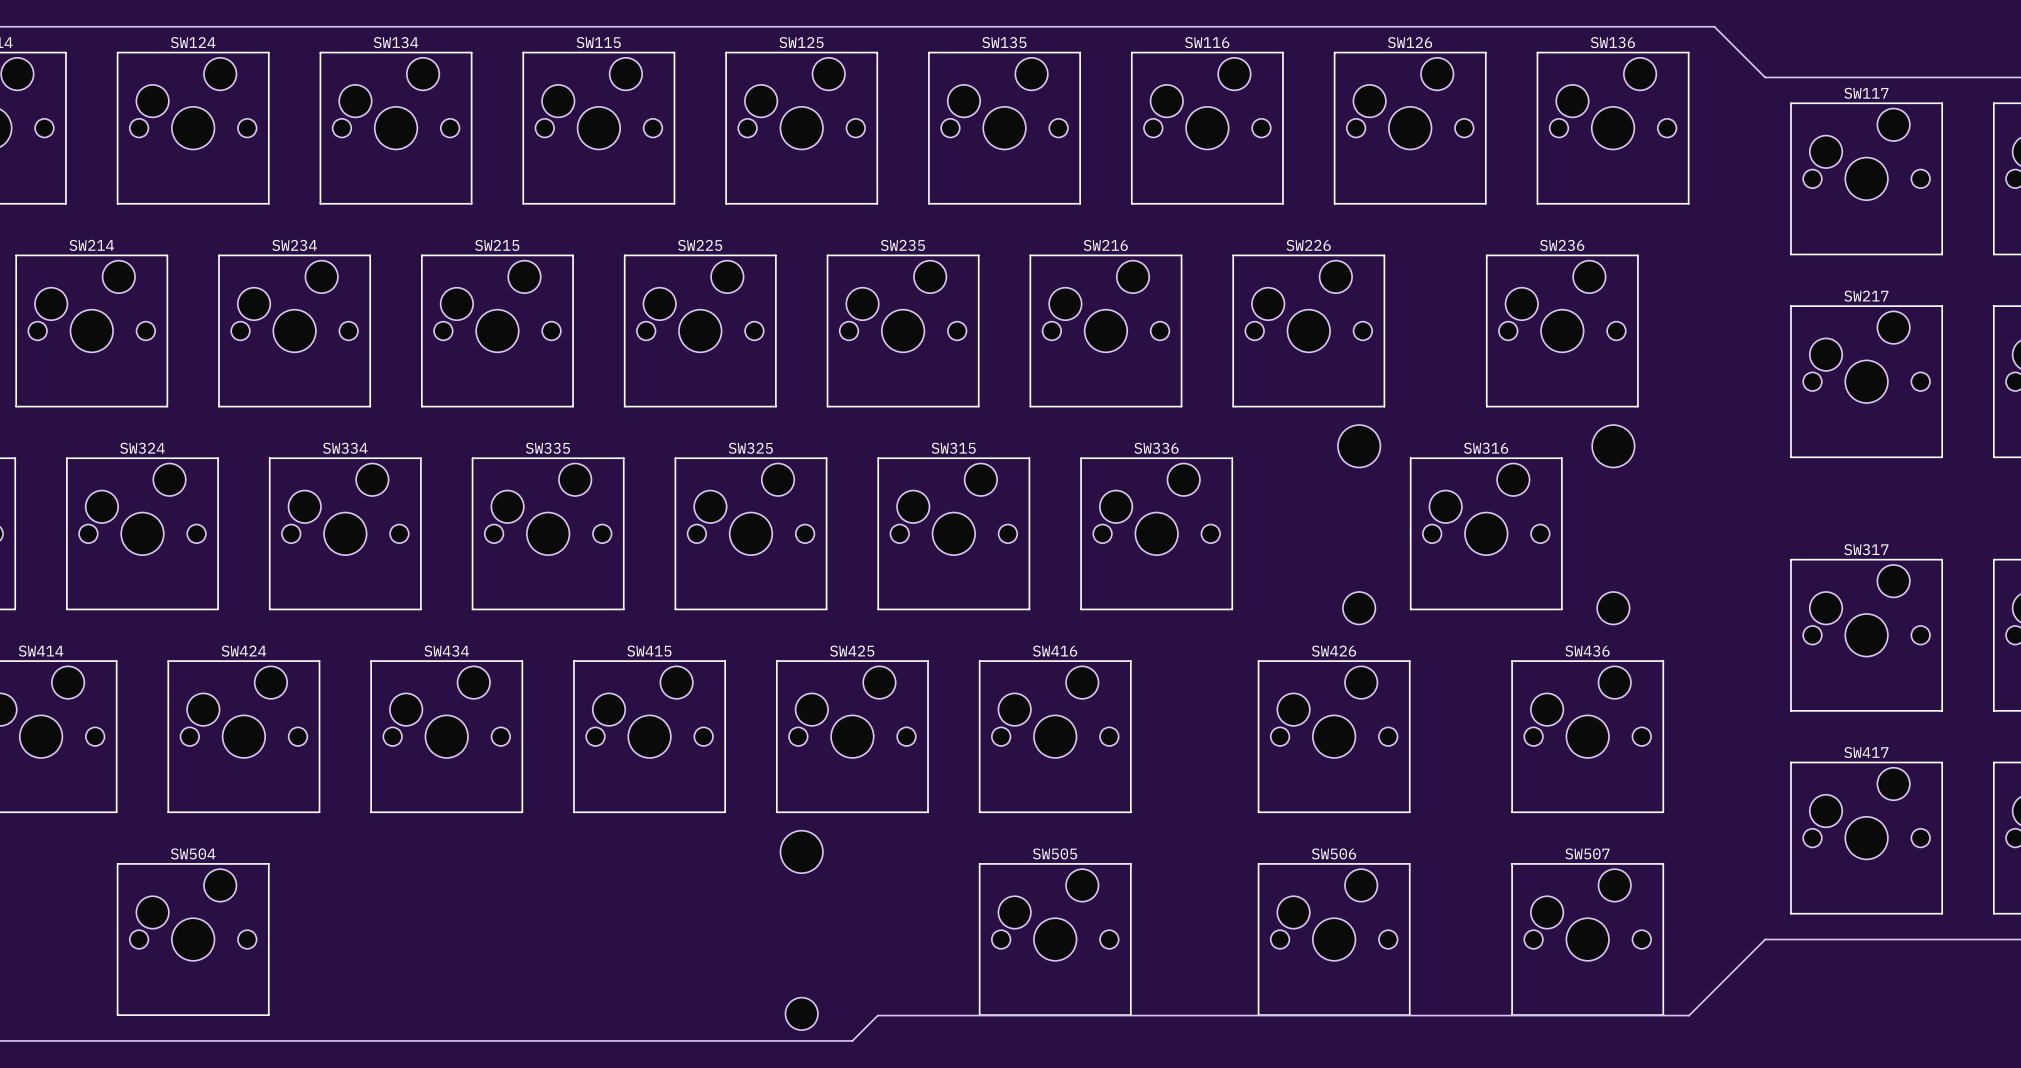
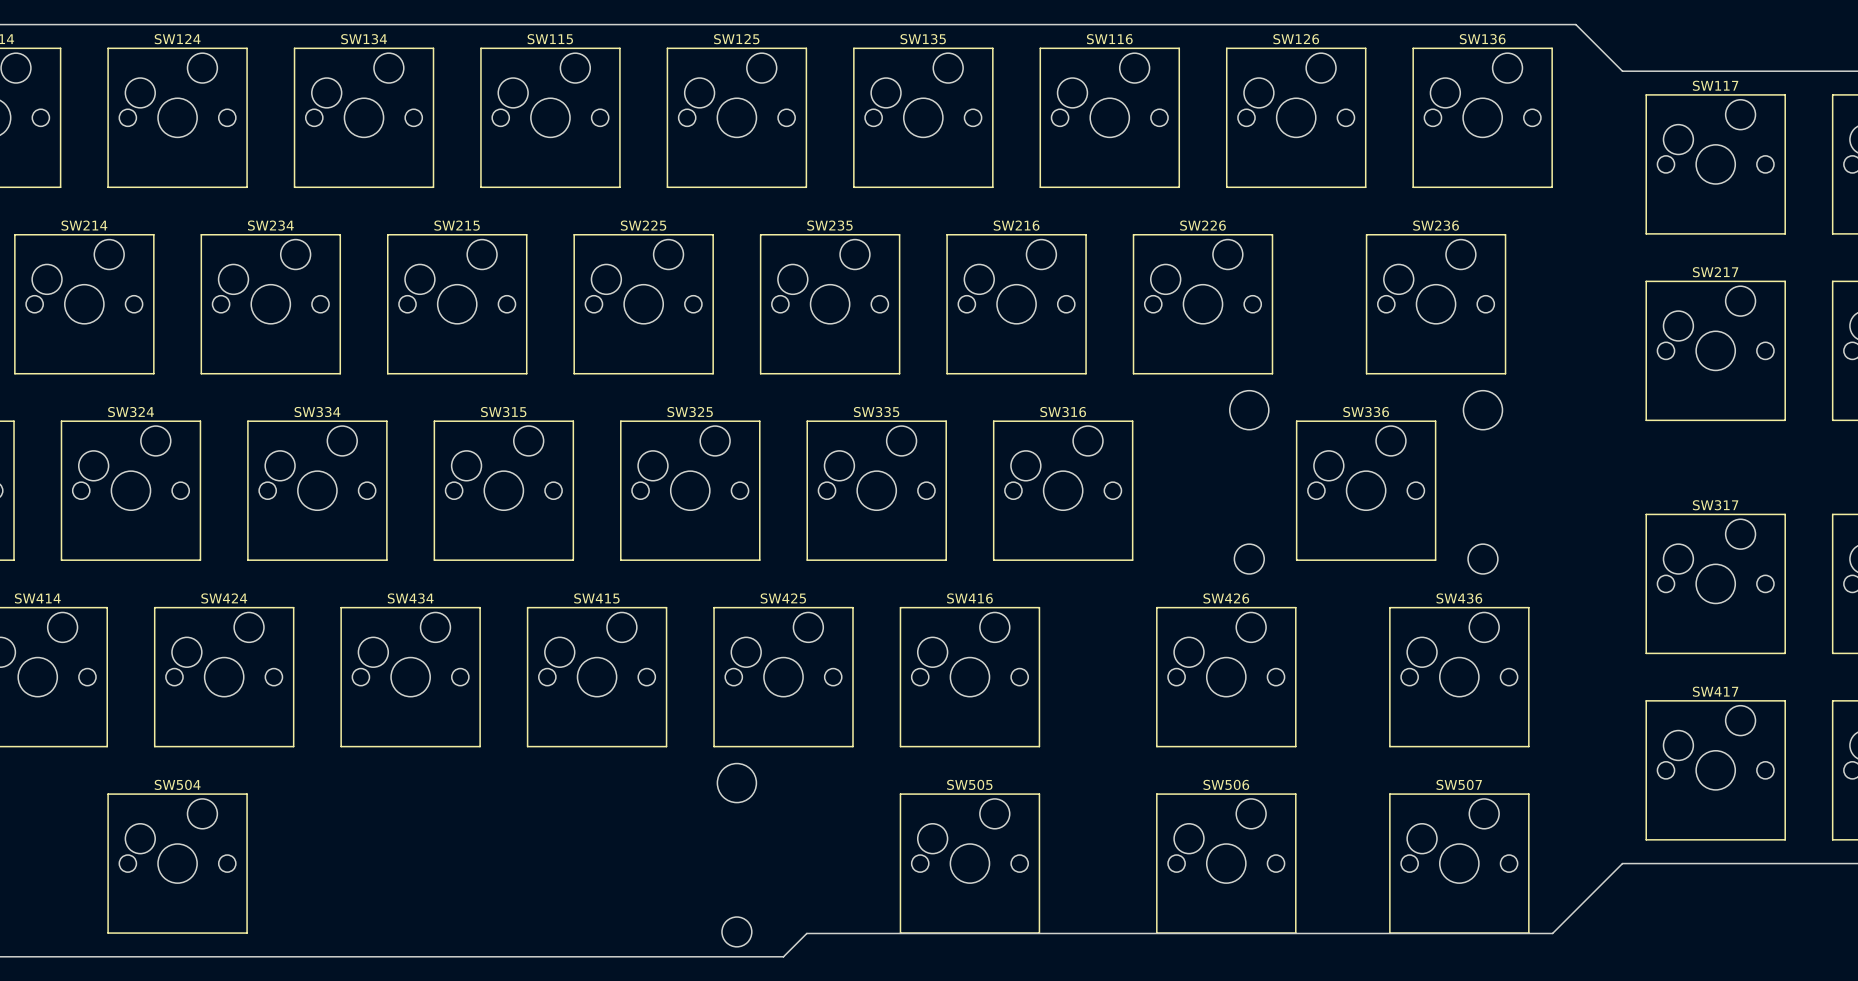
SW335 name: SW335 (547, 448) -> SW315 (503, 412)
SW315 name: SW315 (953, 448) -> SW335 (876, 412)
SW336 name: SW336 (1156, 448) -> SW316 (1063, 412)
SW316 name: SW316 (1486, 448) -> SW336 (1366, 412)

